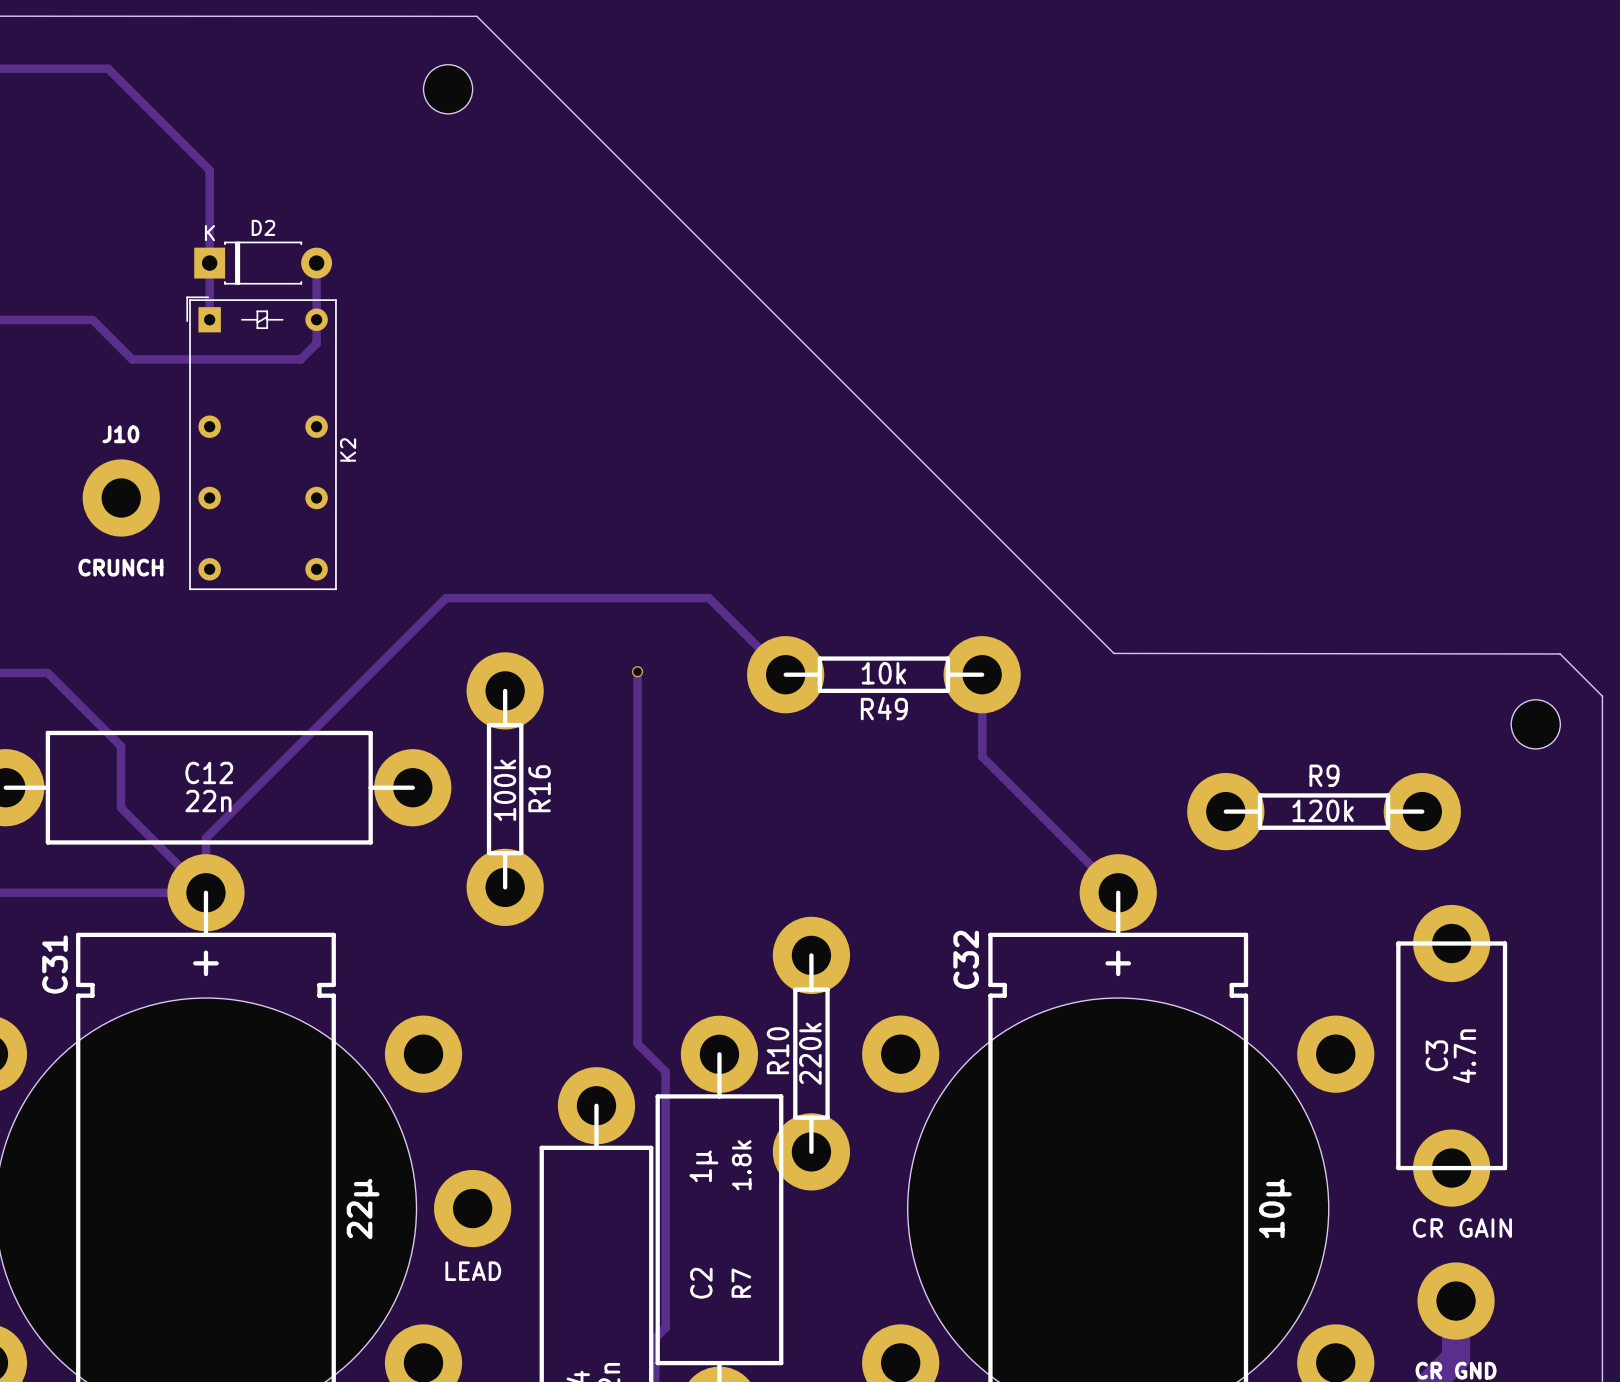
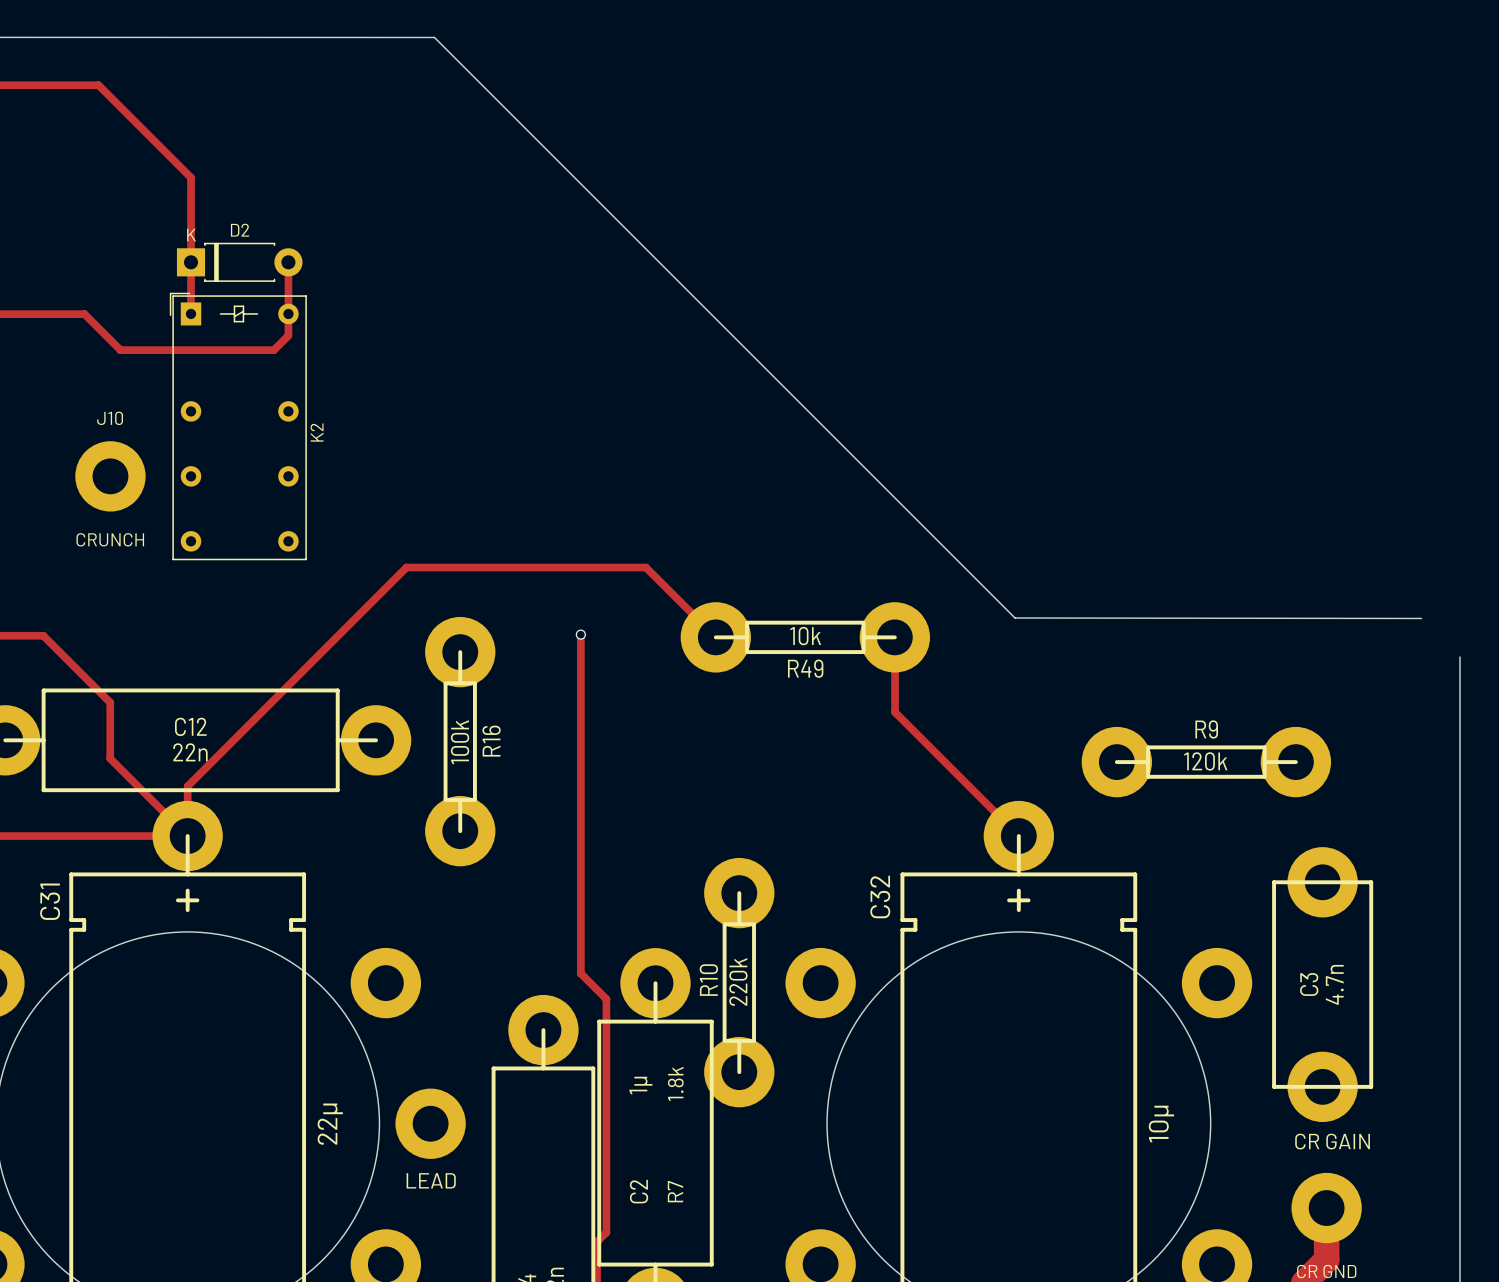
part: (448, 89) -> none
board edge: (1560, 654) (1602, 696) -> none
part: (1535, 724) -> none

